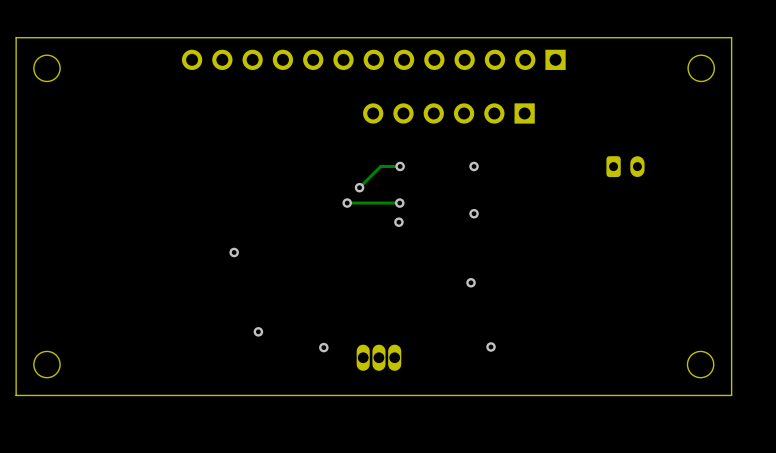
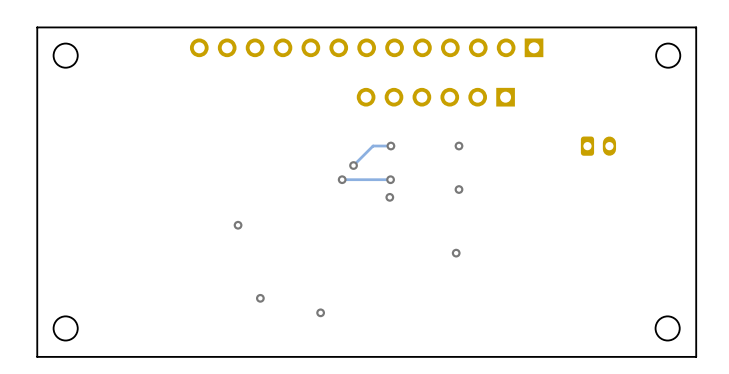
via: (491, 346) -> none
part: (378, 357) -> none

